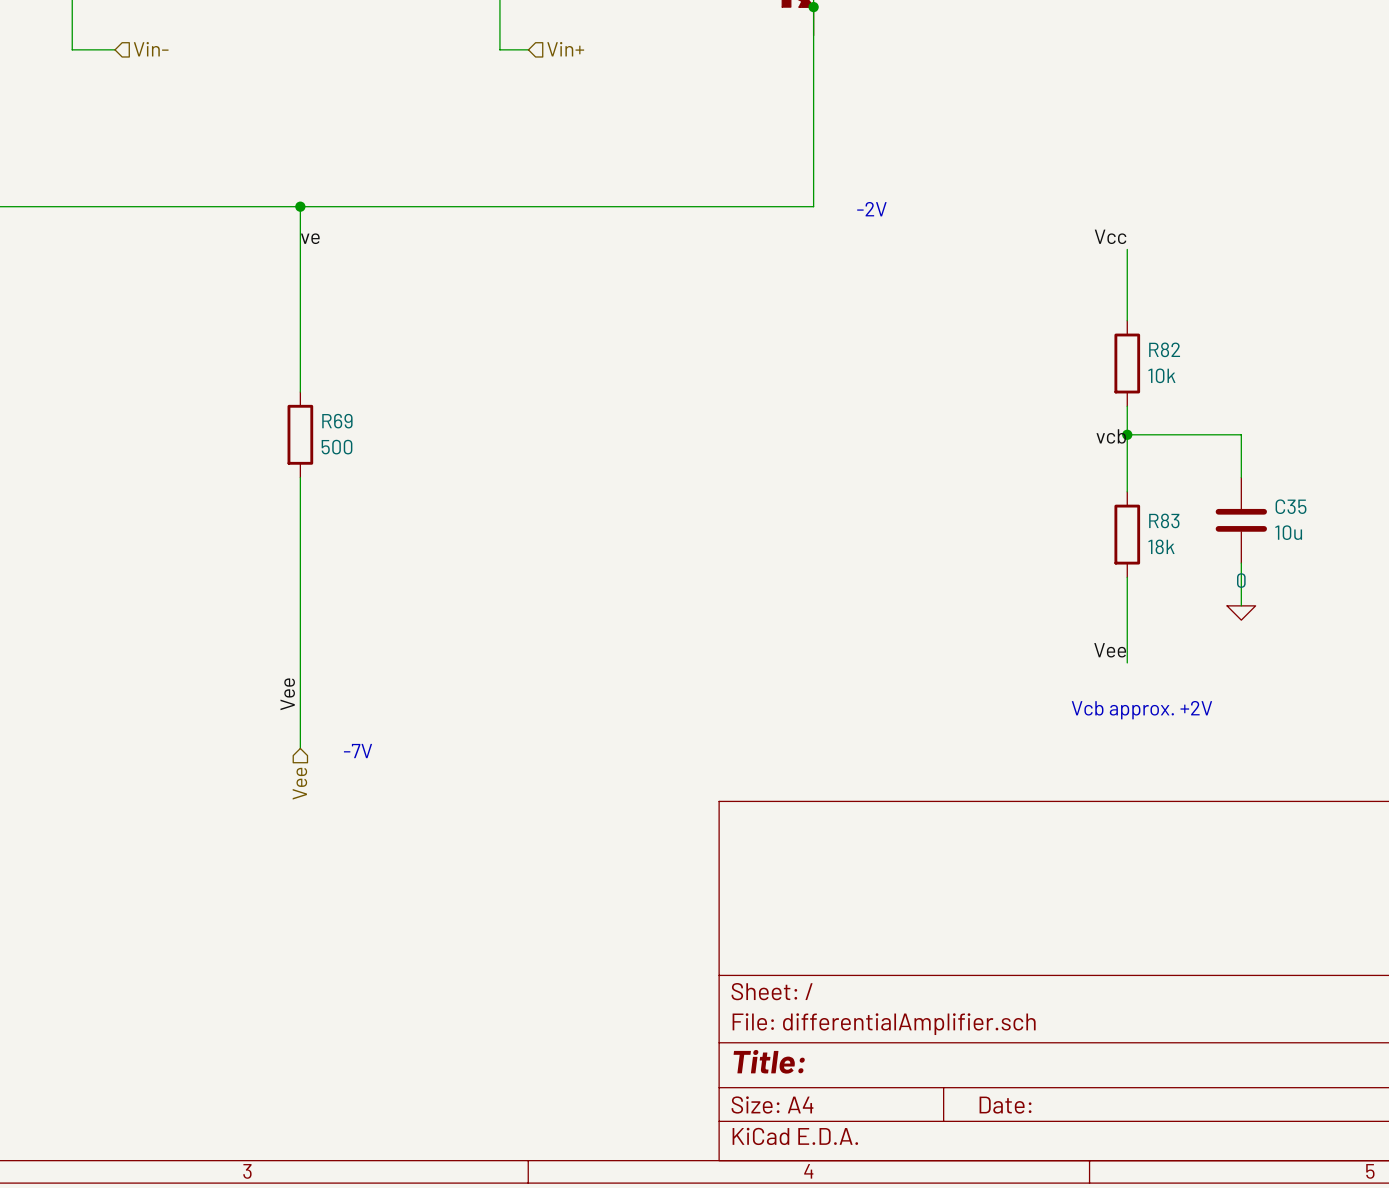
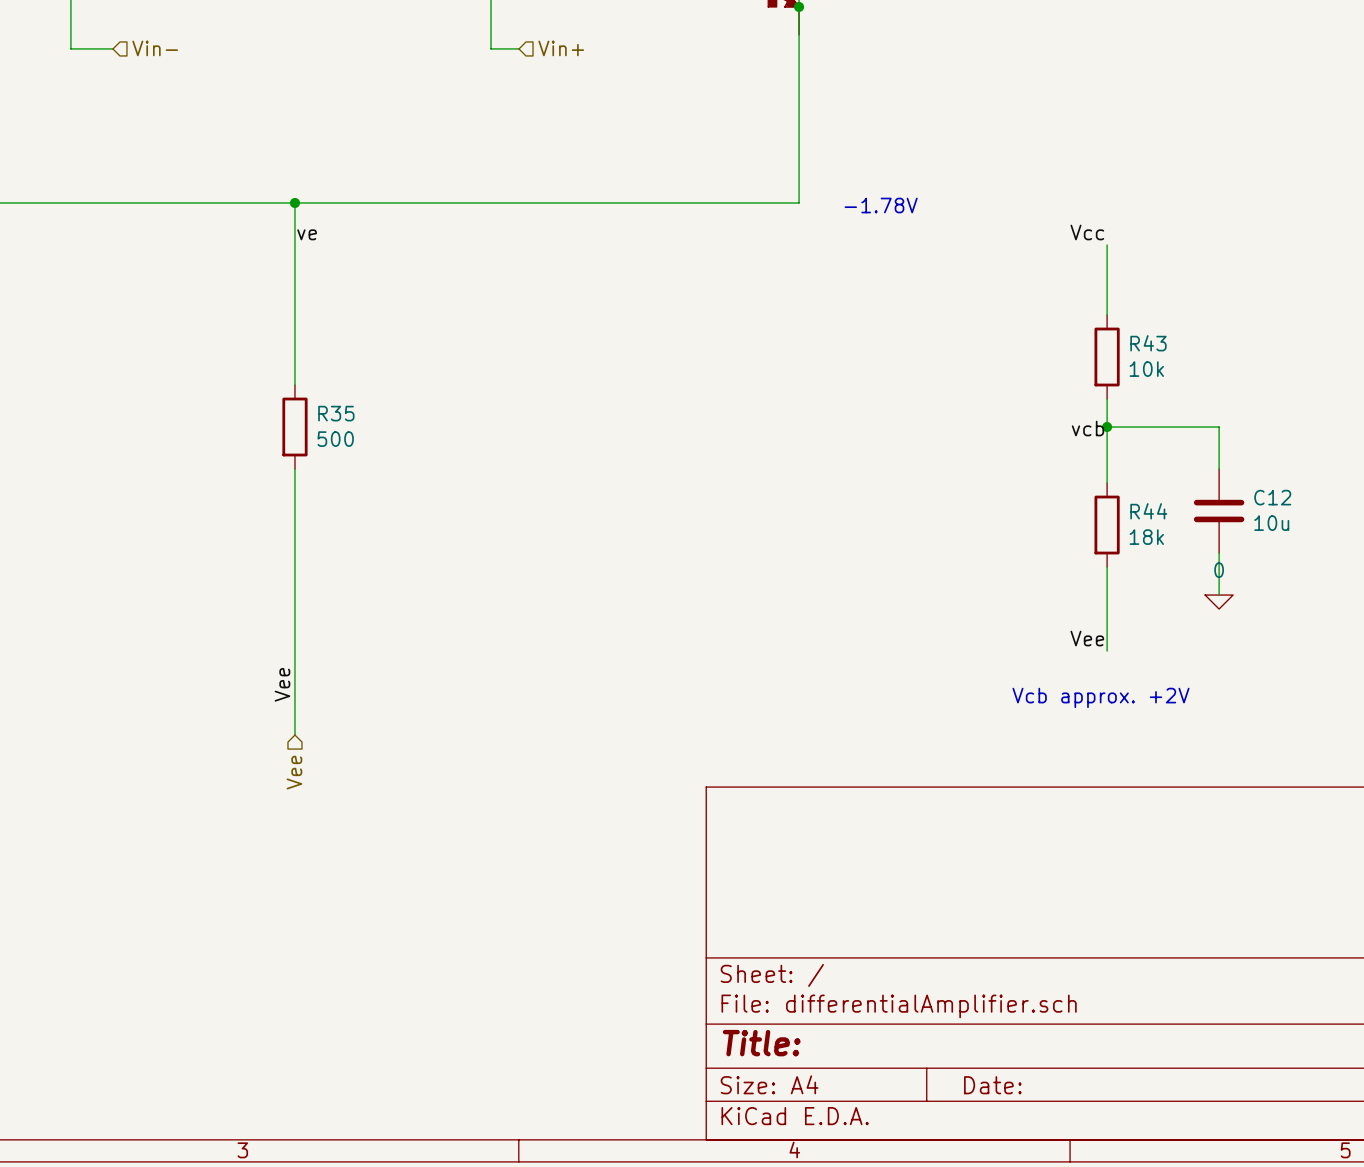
text: -2V (871, 209) -> -1.78V (881, 205)
R82 name: R82 (1164, 349) -> R43 (1148, 343)
R69 name: R69 (337, 421) -> R35 (336, 413)
C35 name: C35 (1291, 506) -> C12 (1272, 497)
R83 name: R83 (1164, 520) -> R44 (1148, 511)
text: -7V (358, 751) -> none

